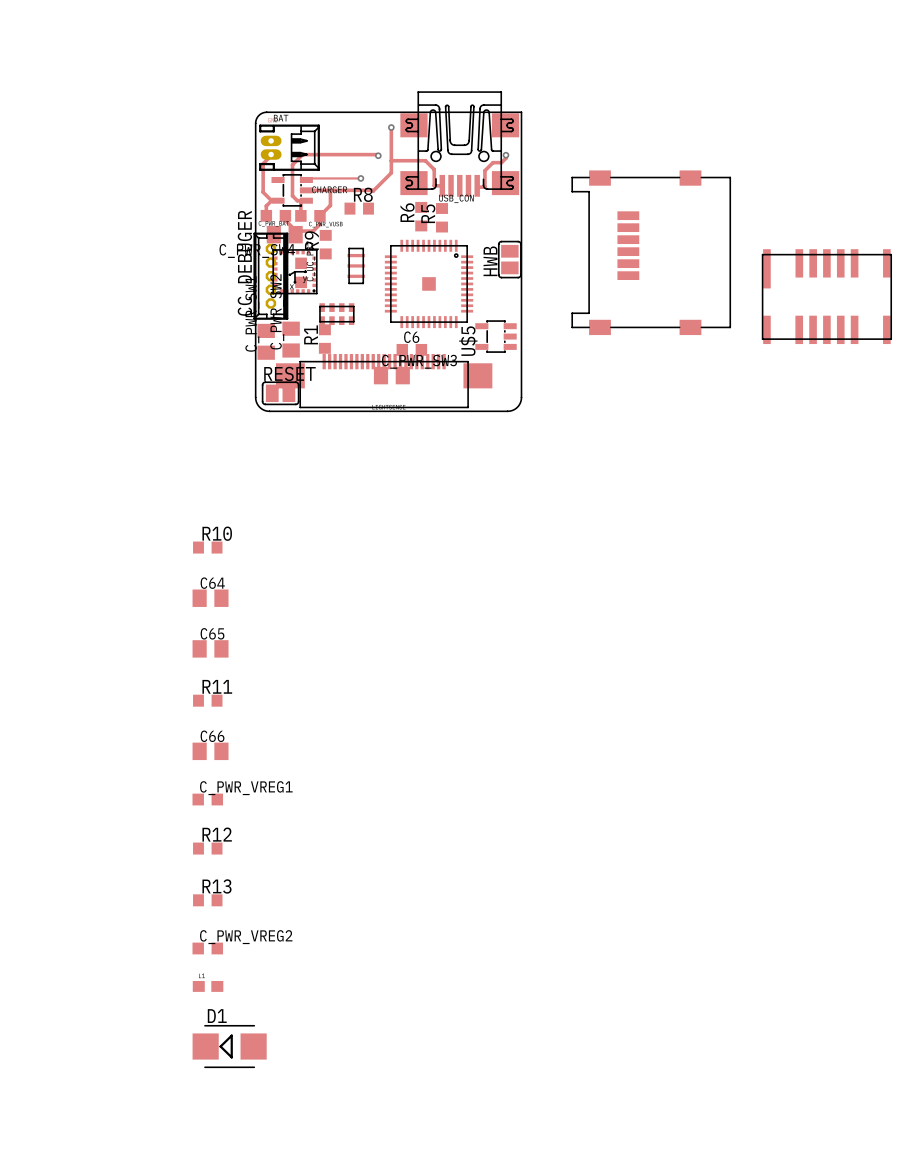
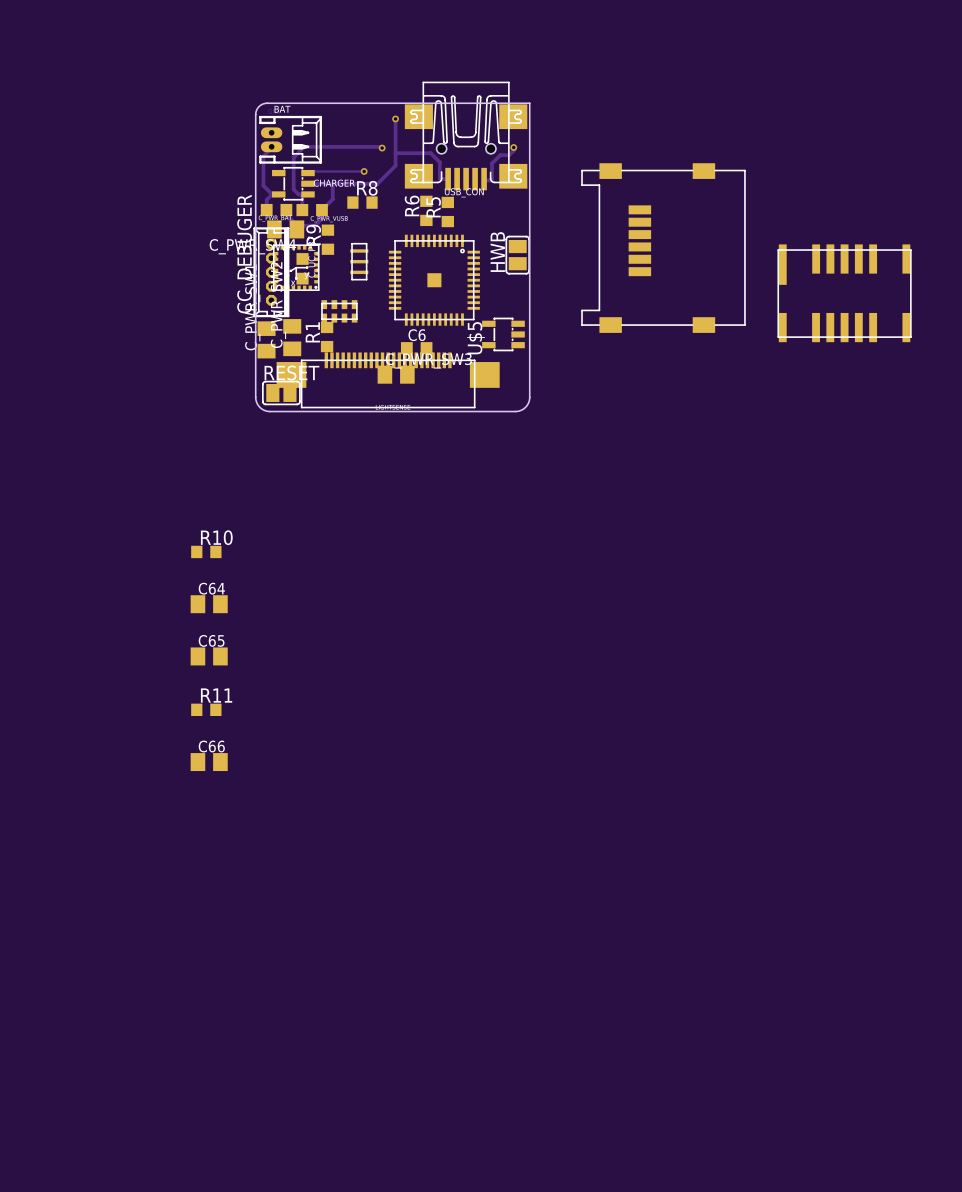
C_PWR_VREG1: (207, 799) -> none
R12: (207, 848) -> none
R13: (207, 900) -> none
C_PWR_VREG2: (207, 948) -> none
part: (208, 986) -> none
D1: (229, 1046) -> none

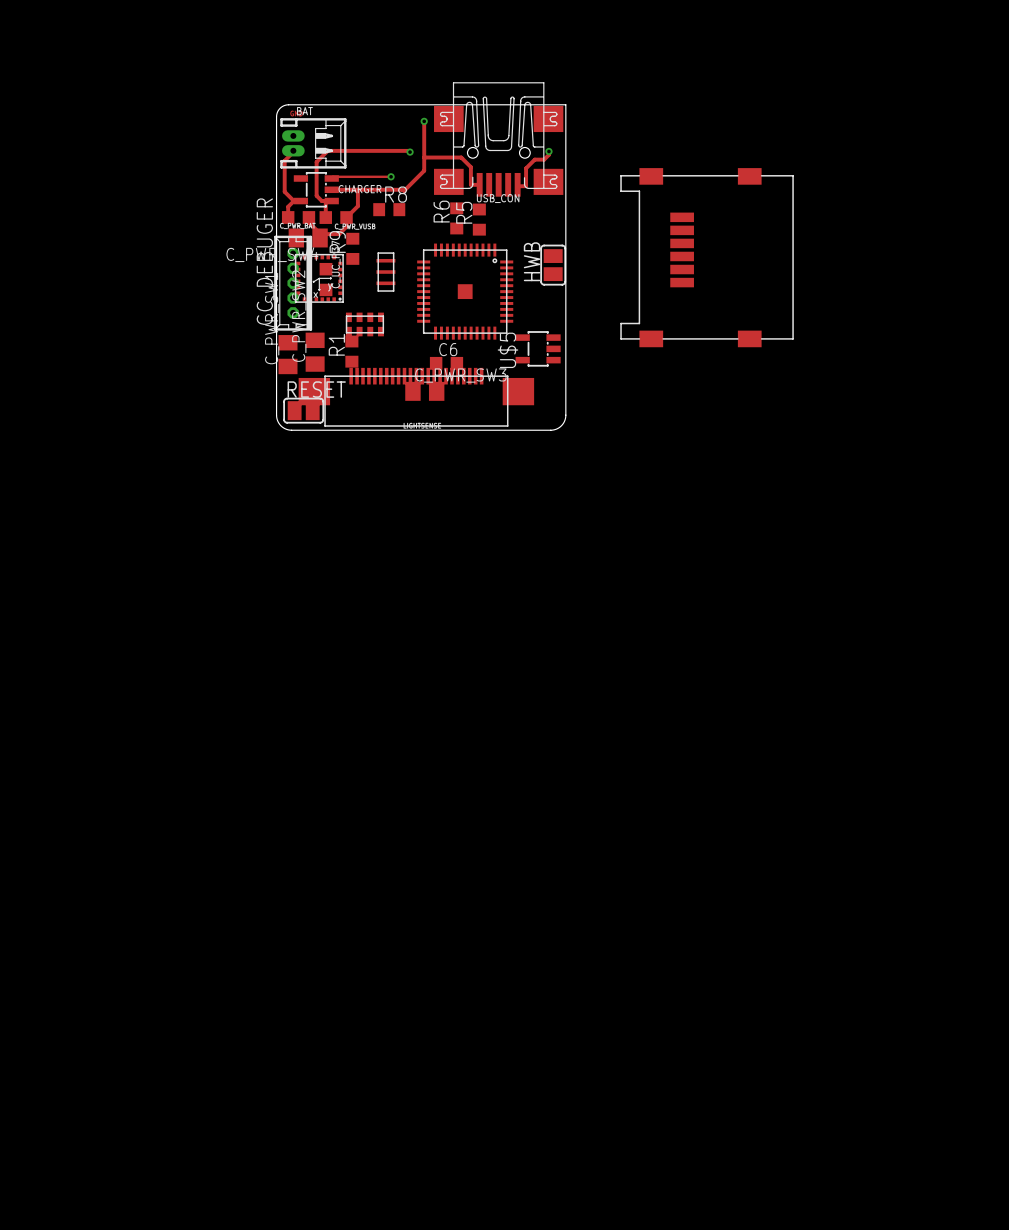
part: (844, 293) -> none
R10: (206, 551) -> none
C64: (209, 604) -> none
C65: (209, 656) -> none
R11: (206, 709) -> none
C66: (209, 762) -> none

